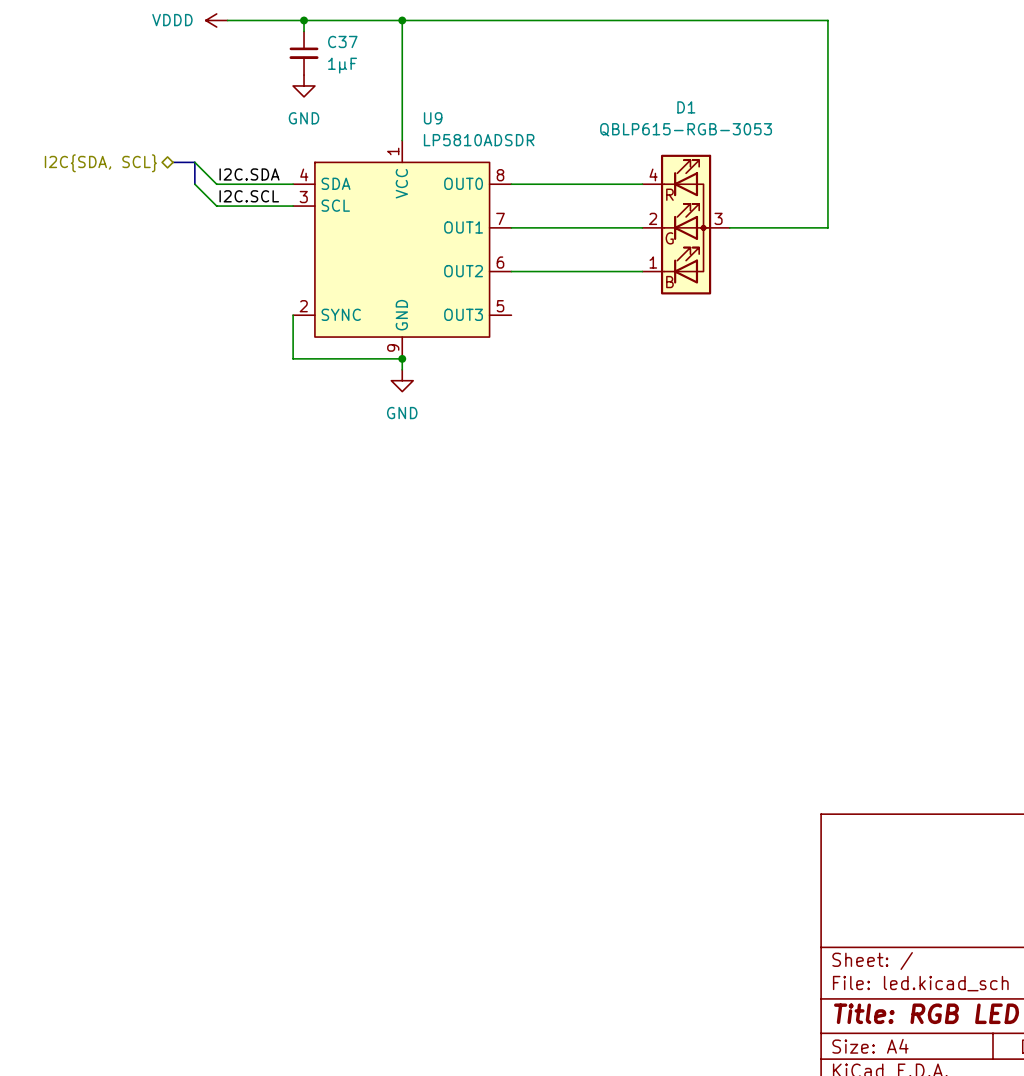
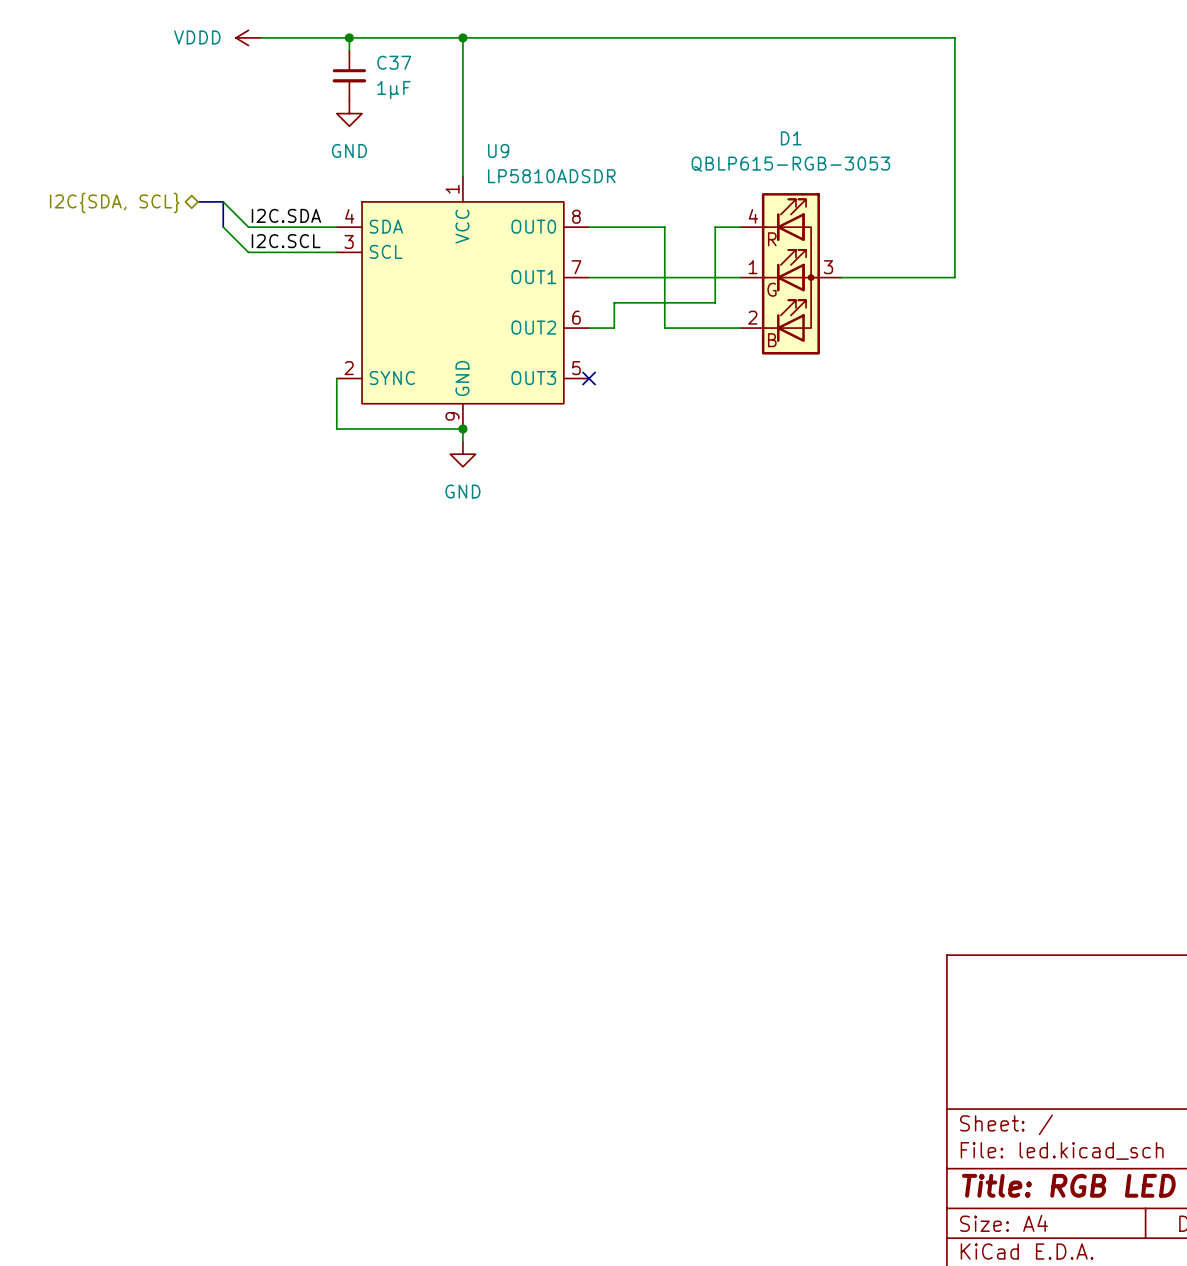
wire: (576, 184) (620, 184) -> (664, 227) (664, 328)
D1 pin number: 2 (653, 218) -> 1 (753, 267)
D1 pin number: 1 (653, 262) -> 2 (752, 317)
wire: (533, 271) (576, 271) -> (614, 328) (614, 302) (715, 302) (715, 227)
no-connect mark: none -> (589, 378)

